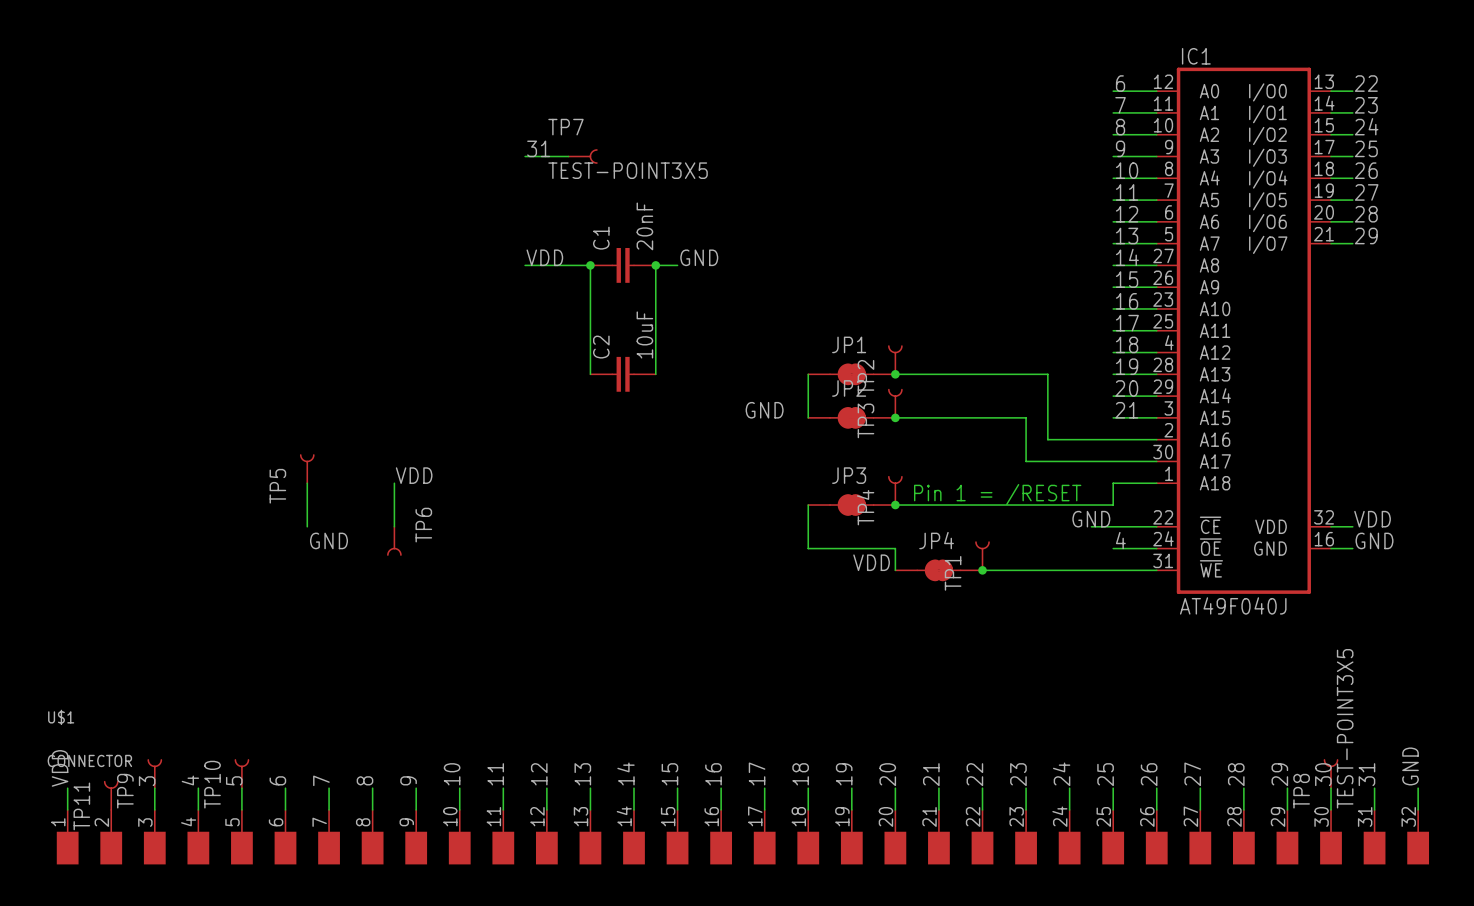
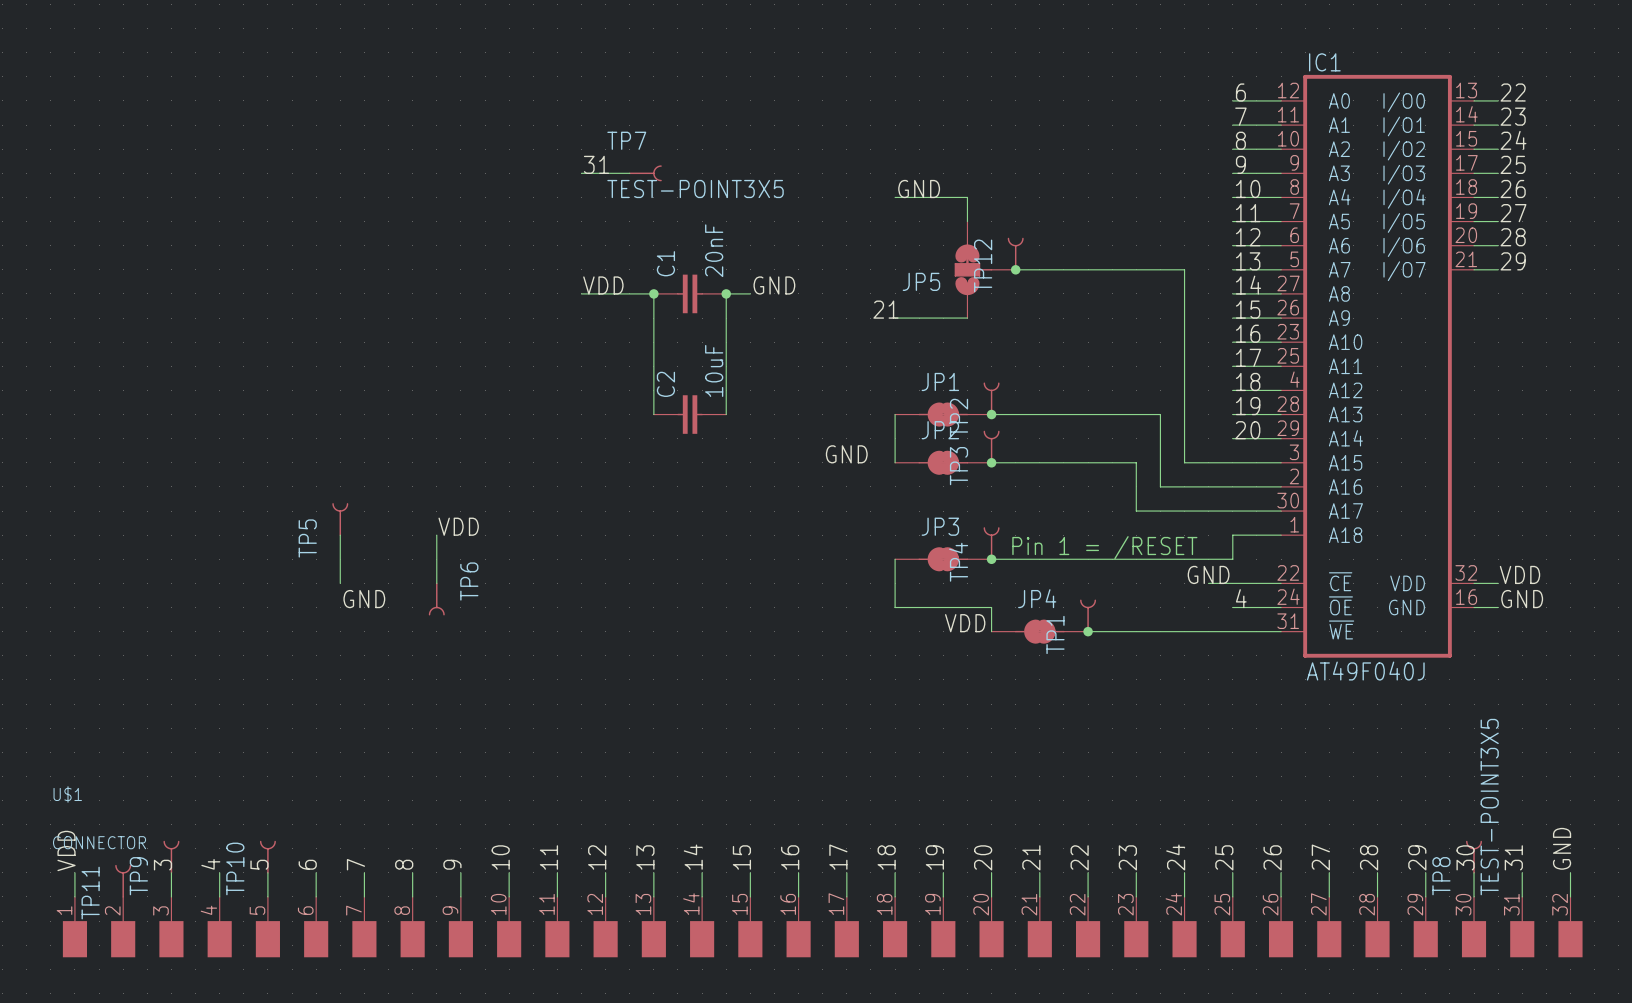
label: none -> GND (919, 189)
wire: none -> (895, 197) (967, 197) (967, 221)
TP12: none -> (1015, 254)
JP5: none -> (985, 269)
wire: none -> (1015, 269) (1184, 269) (1184, 462) (1232, 462)
junction: none -> (1015, 269)
label: none -> 21 (885, 309)
wire: none -> (895, 318) (967, 318)
label: 21 (1126, 410) -> none

